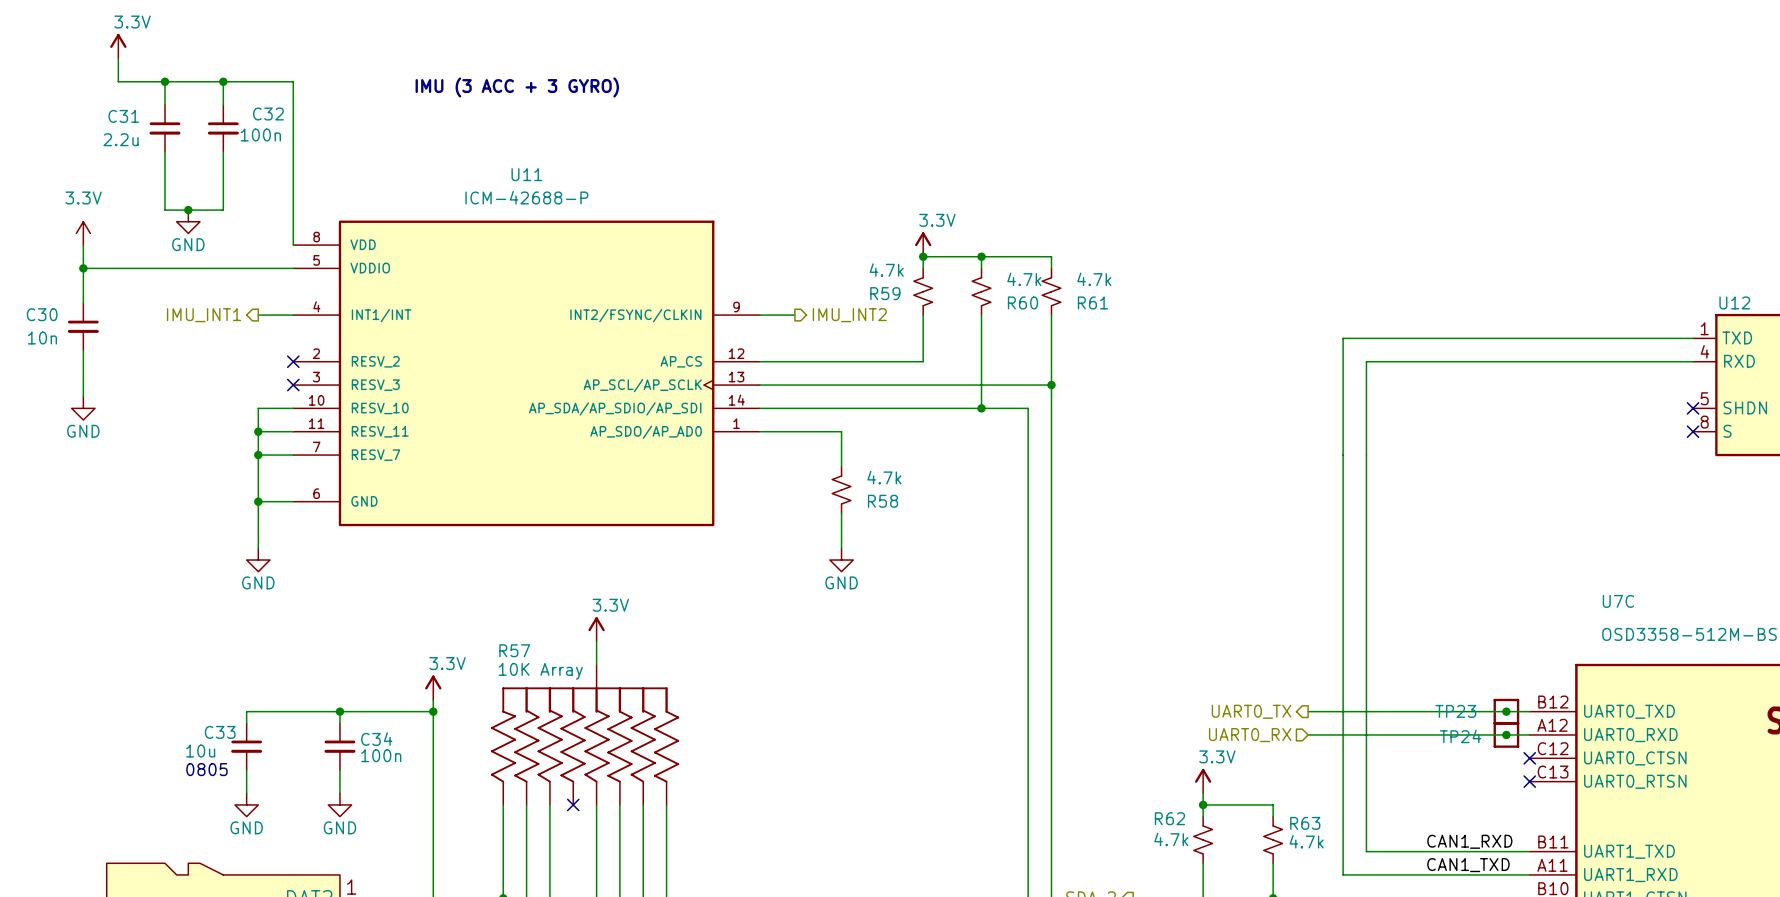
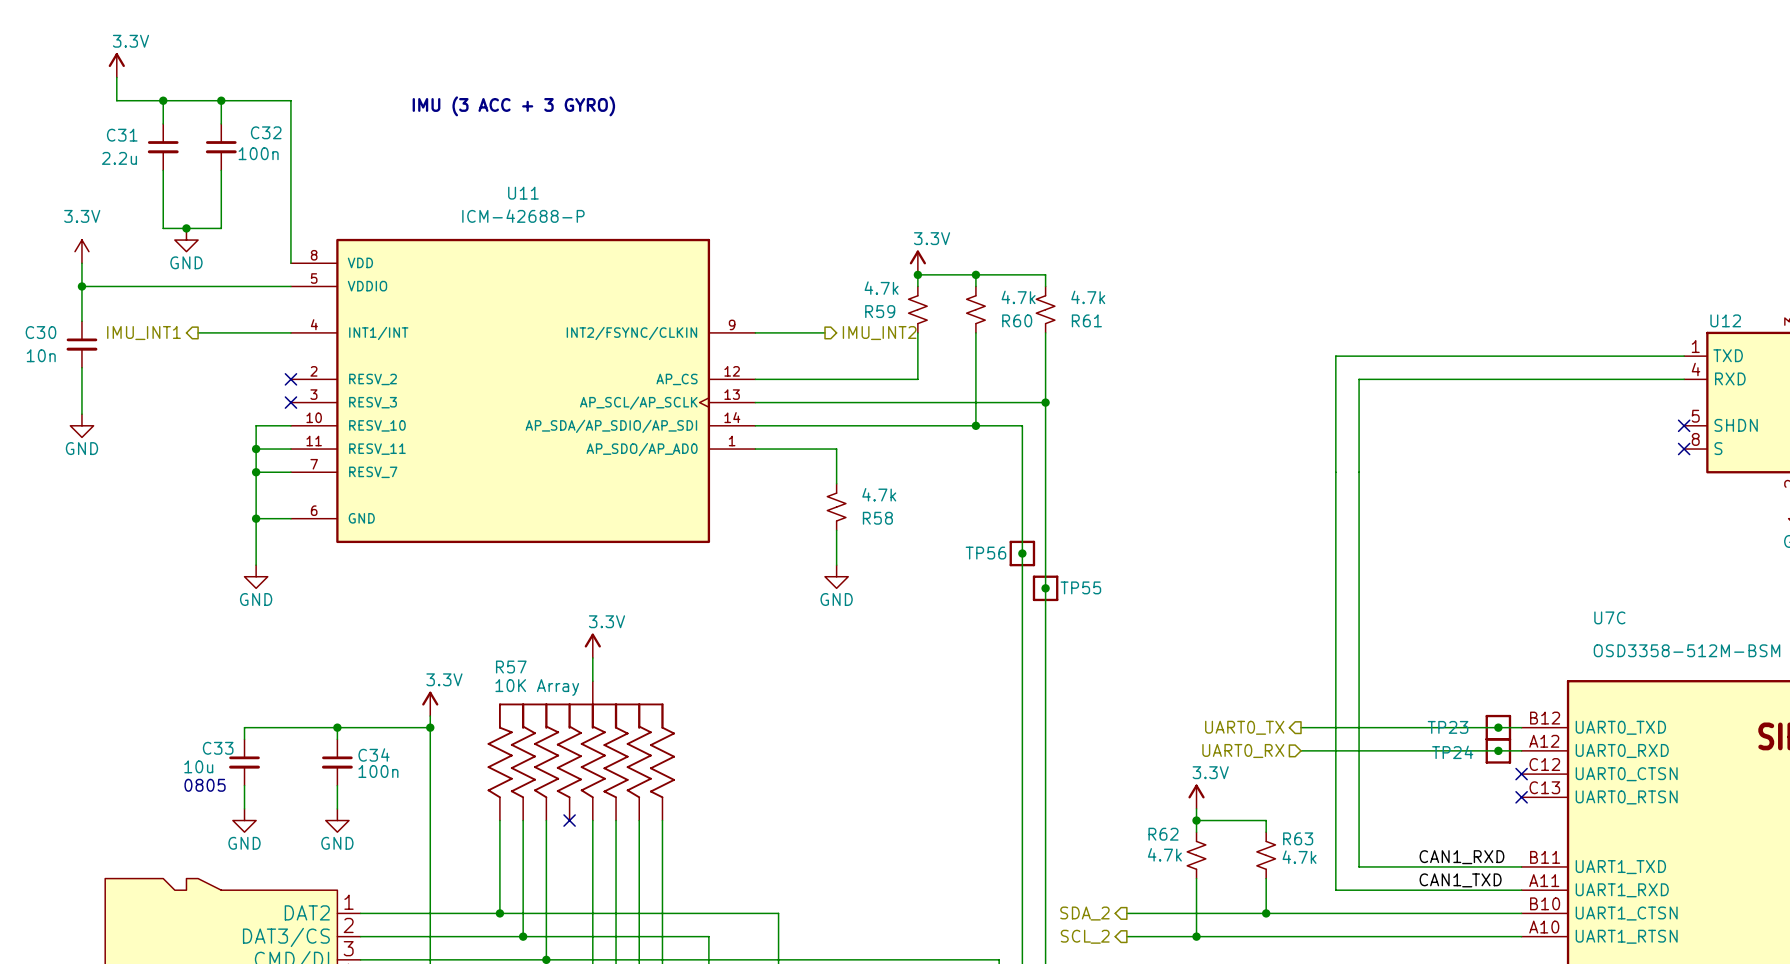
wire: none -> (198, 332) (256, 332)
hierarchical label position: IMU_INT1 (203, 315) -> IMU_INT1 (143, 333)
wire: none -> (790, 332) (825, 332)
hierarchical label position: IMU_INT2 (849, 315) -> IMU_INT2 (879, 333)
junction: none -> (1022, 553)
TP56: none -> (1022, 553)
junction: none -> (1045, 588)
TP55: none -> (1045, 588)

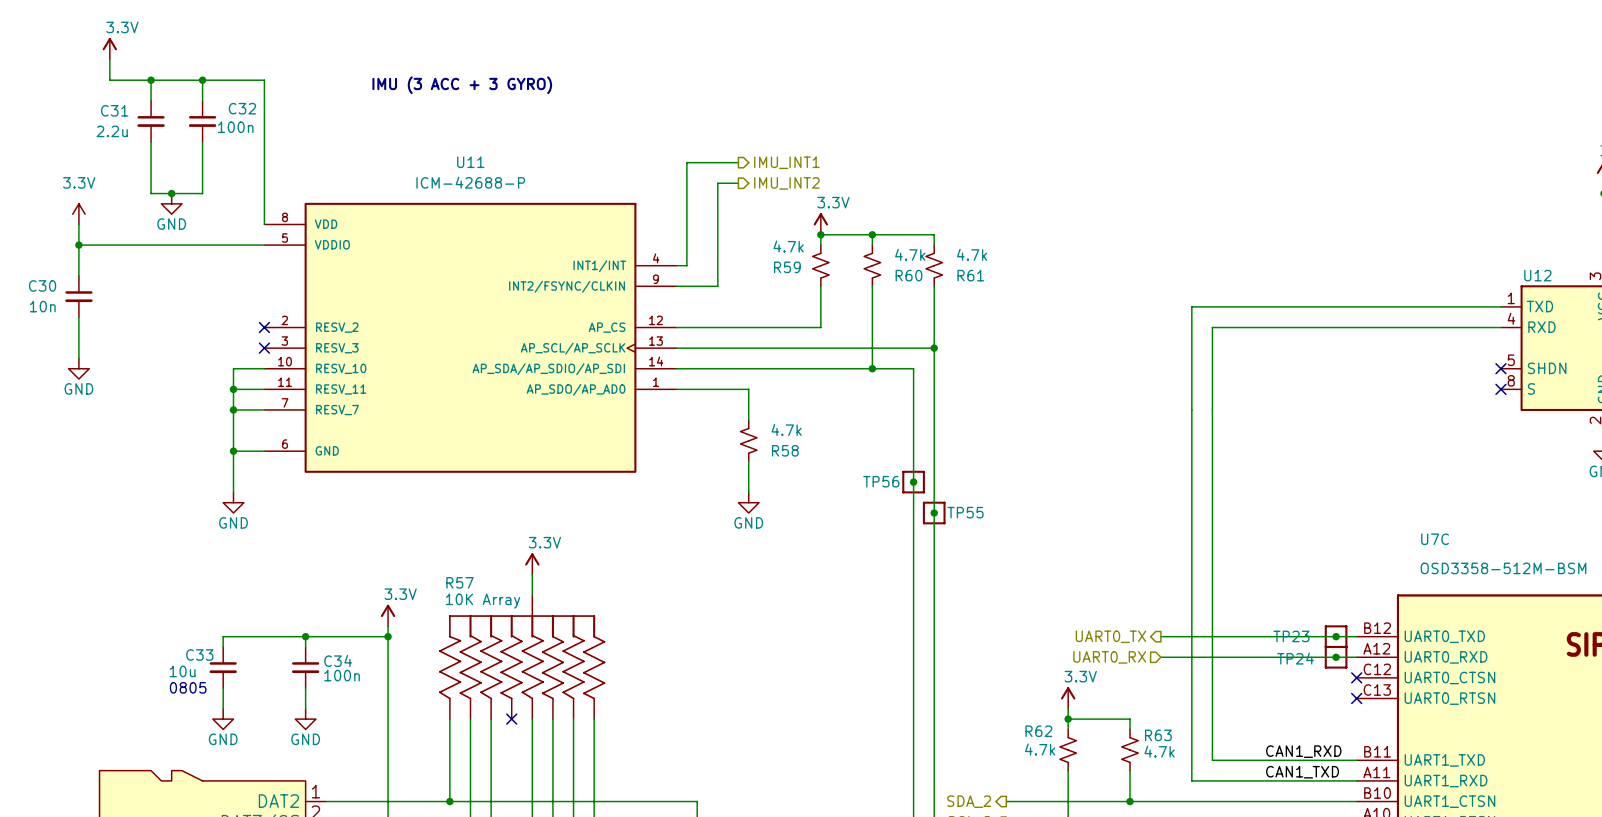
wire: none -> (738, 162) (686, 162) (686, 265) (676, 265)
hierarchical label: none -> IMU_INT1 (786, 162)
U11 symbol: [290, 238, 756, 544] -> [264, 202, 677, 473]
wire: (198, 332) (290, 332) -> none
wire: (801, 332) (825, 332) -> (717, 286) (717, 183) (738, 183)
hierarchical label: IMU_INT1 (143, 333) -> none
hierarchical label position: IMU_INT2 (879, 333) -> IMU_INT2 (786, 183)

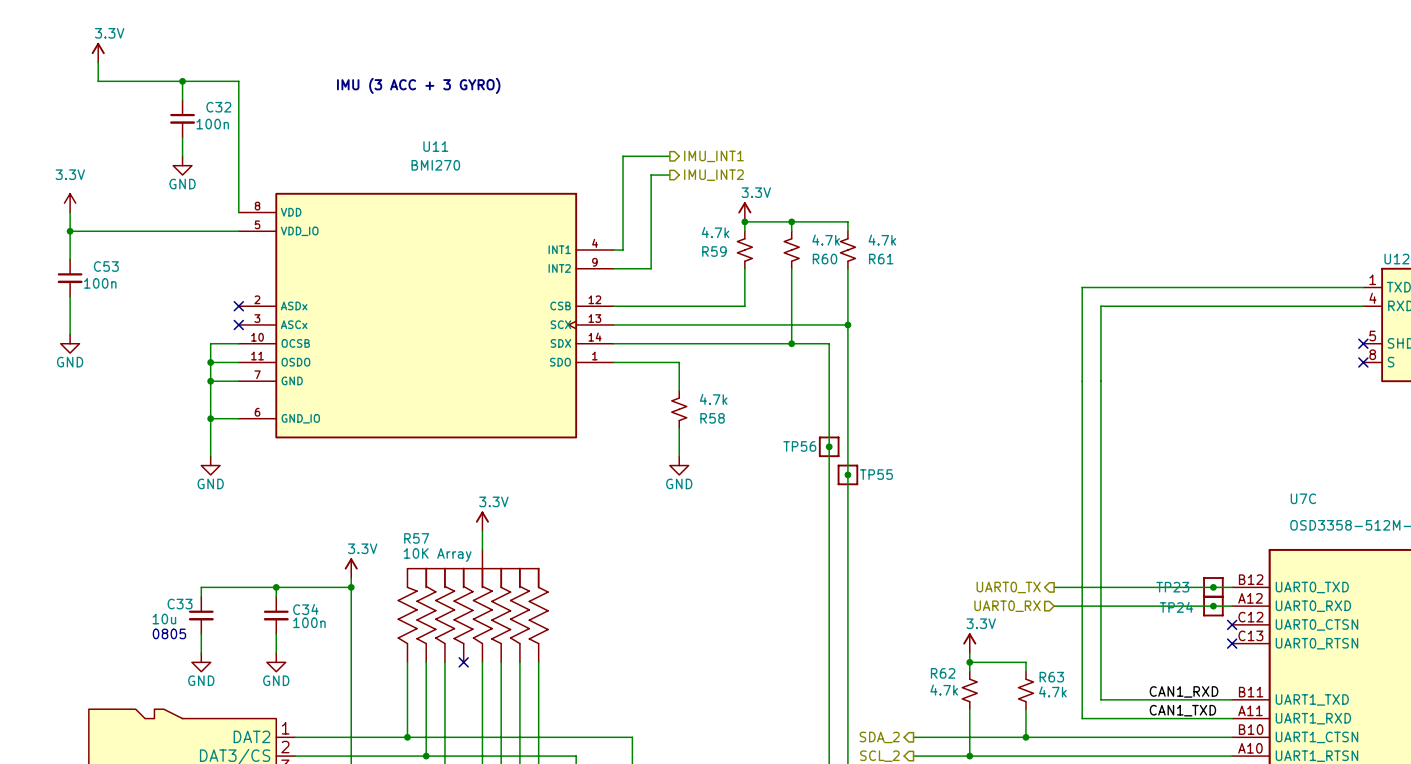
wire: (151, 80) (151, 100) -> none
junction: (151, 80) -> none
C31: 2.2u (151, 121) -> none
wire: (151, 142) (151, 193) (202, 193) (202, 162) -> none
U11 value: ICM-42688-P (470, 182) -> BMI270 (435, 165)
junction: (171, 193) -> none
U11 symbol: [264, 202, 677, 473] -> [238, 192, 614, 439]
power symbol position: GND (171, 203) -> GND (182, 165)
C30 name: C30 (42, 285) -> C53 (106, 266)
C30 value: 10n (42, 306) -> 100n (100, 283)

